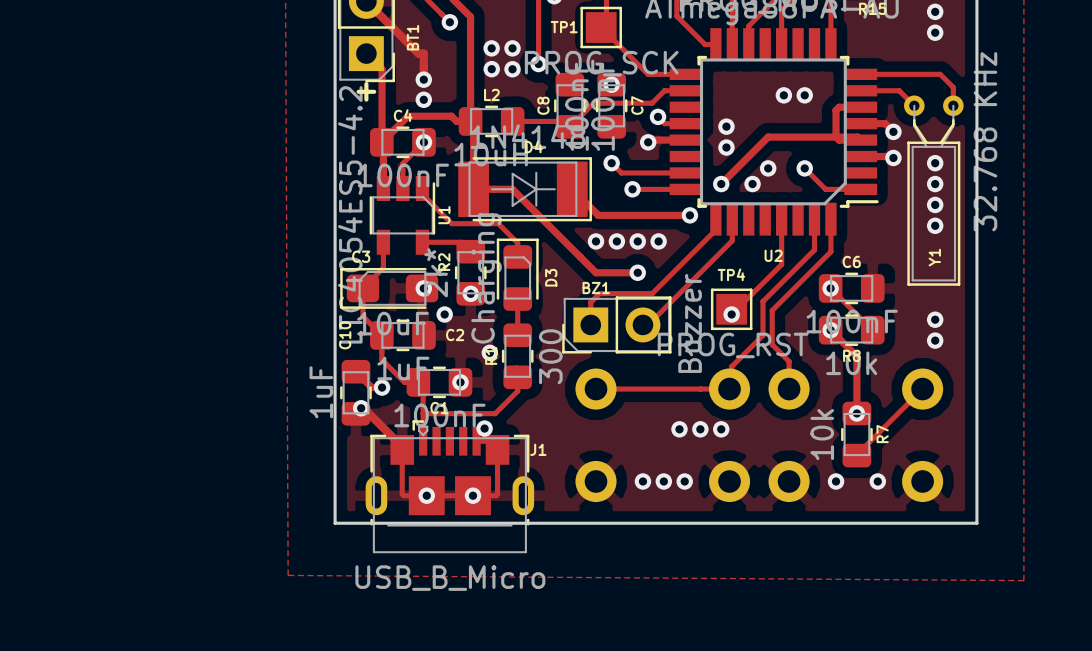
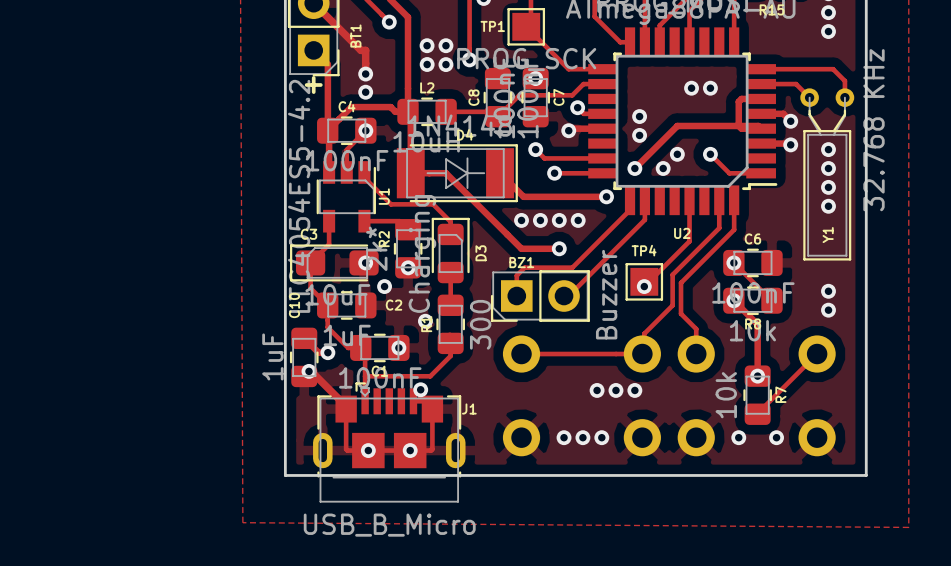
TP4 value: PROG_RST (733, 345) -> none

